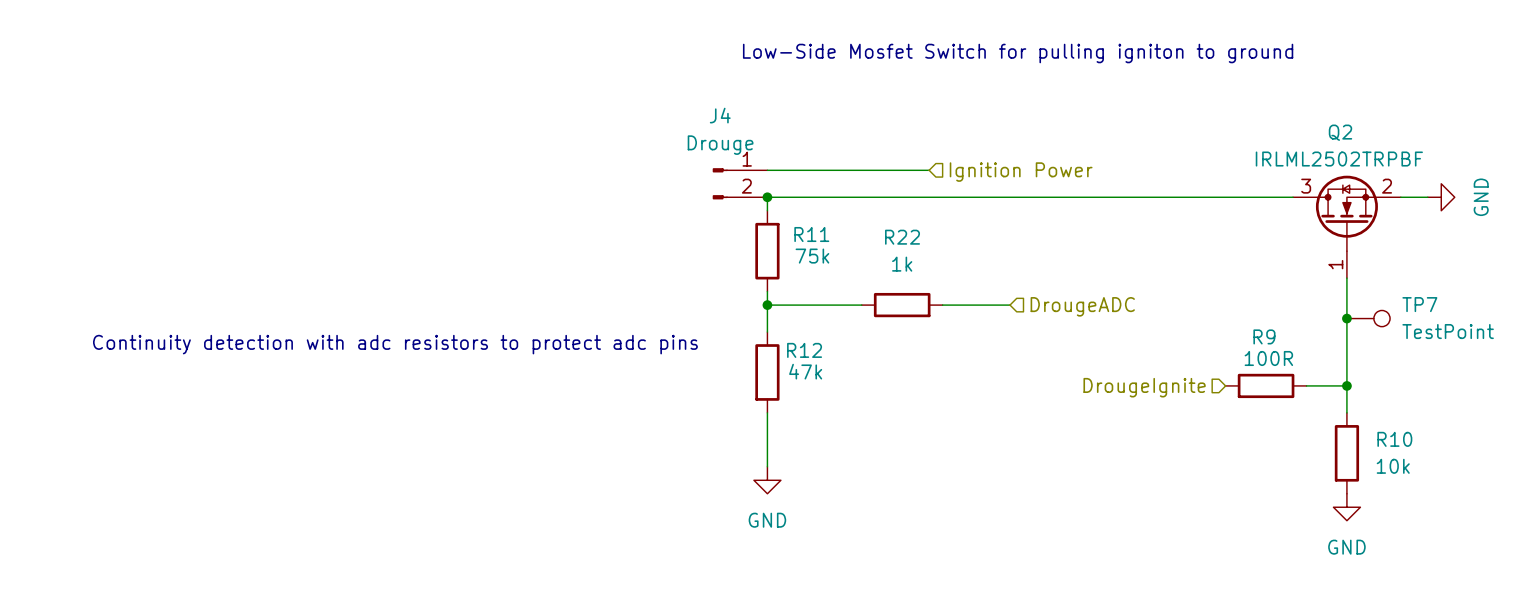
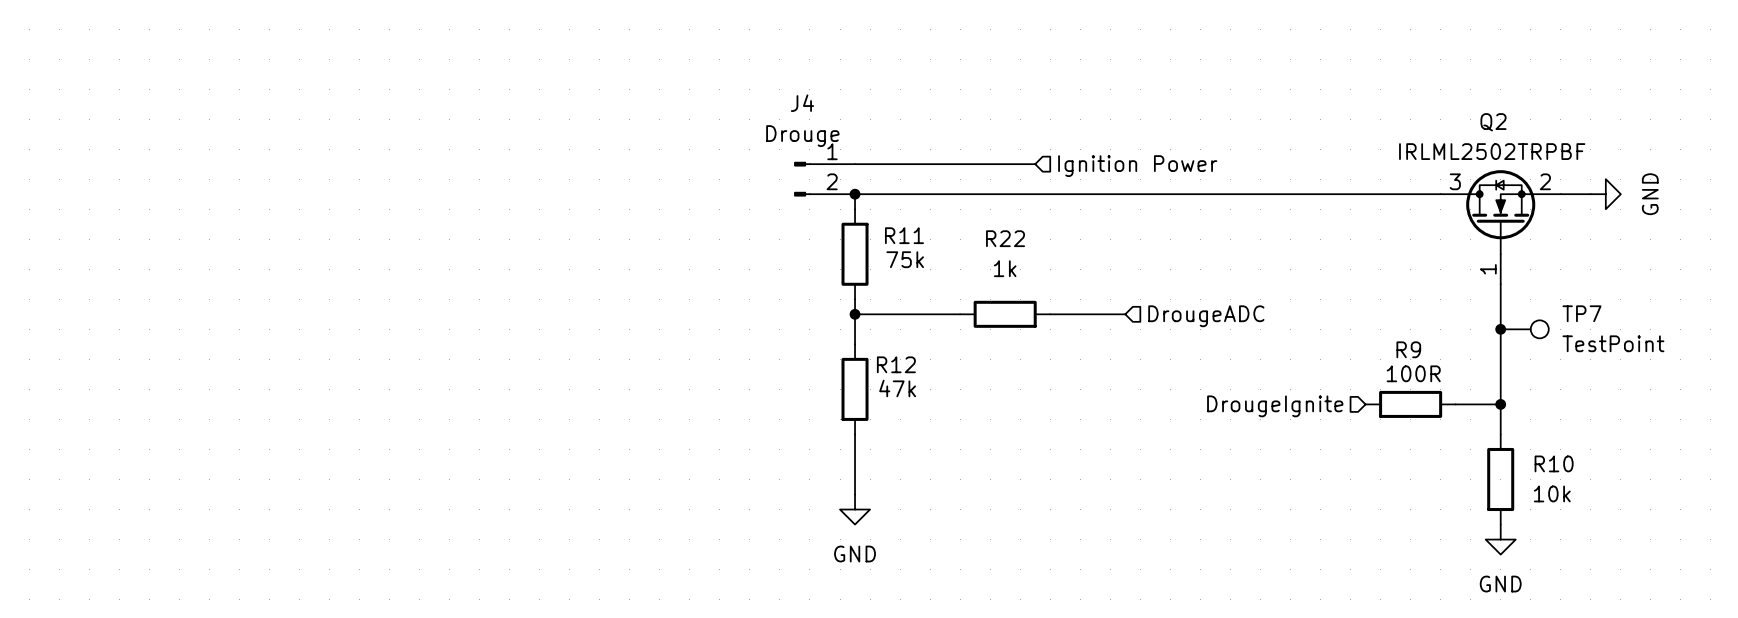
text: Low-Side Mosfet Switch for pulling igniton to ground (1018, 53) -> none
text: Continuity detection with adc resistors to protect adc pins (395, 344) -> none

